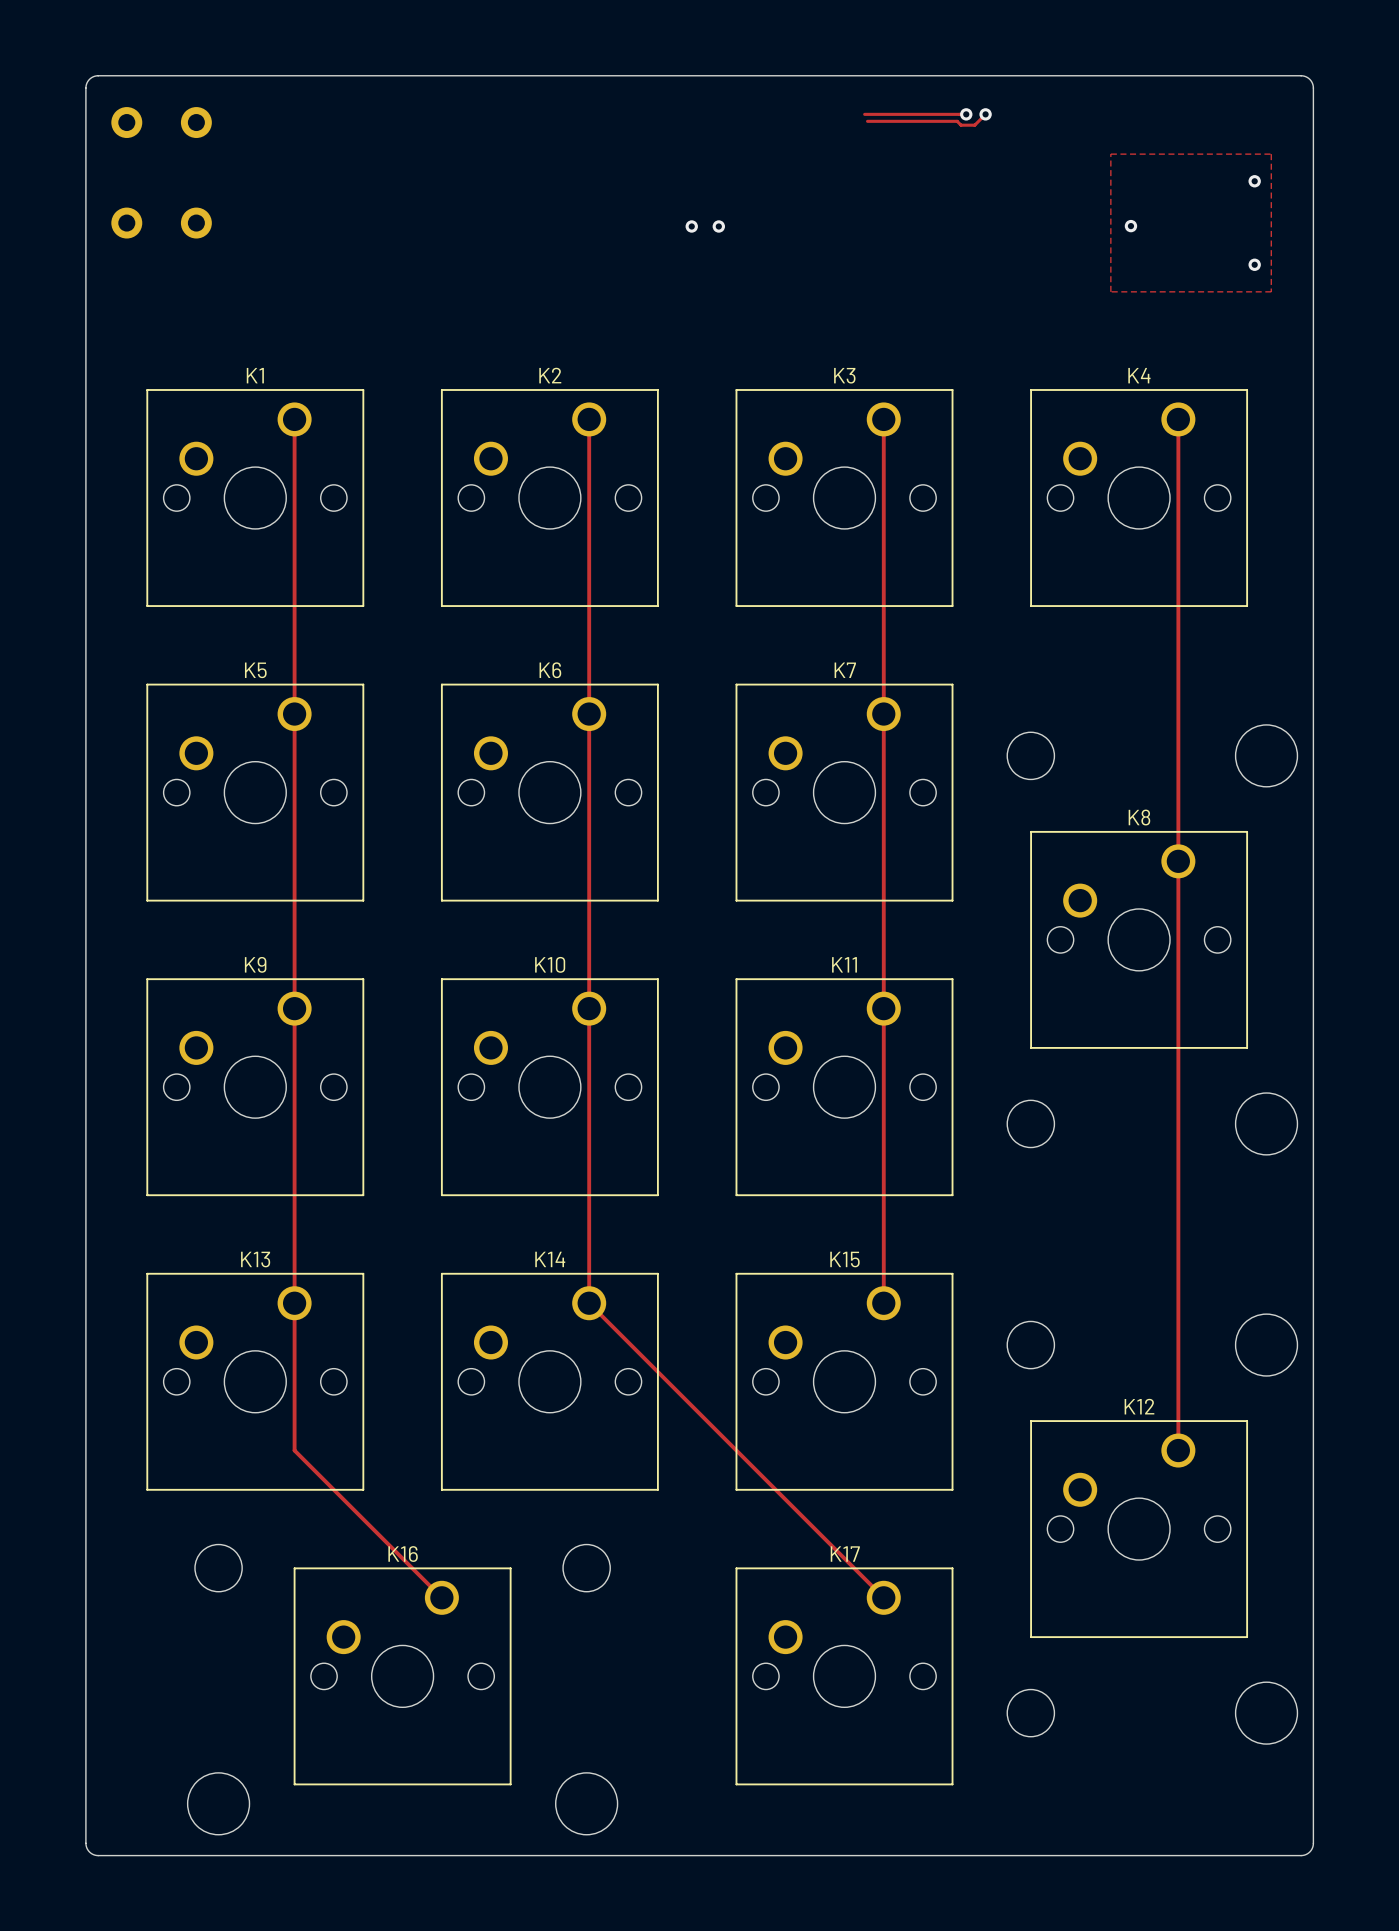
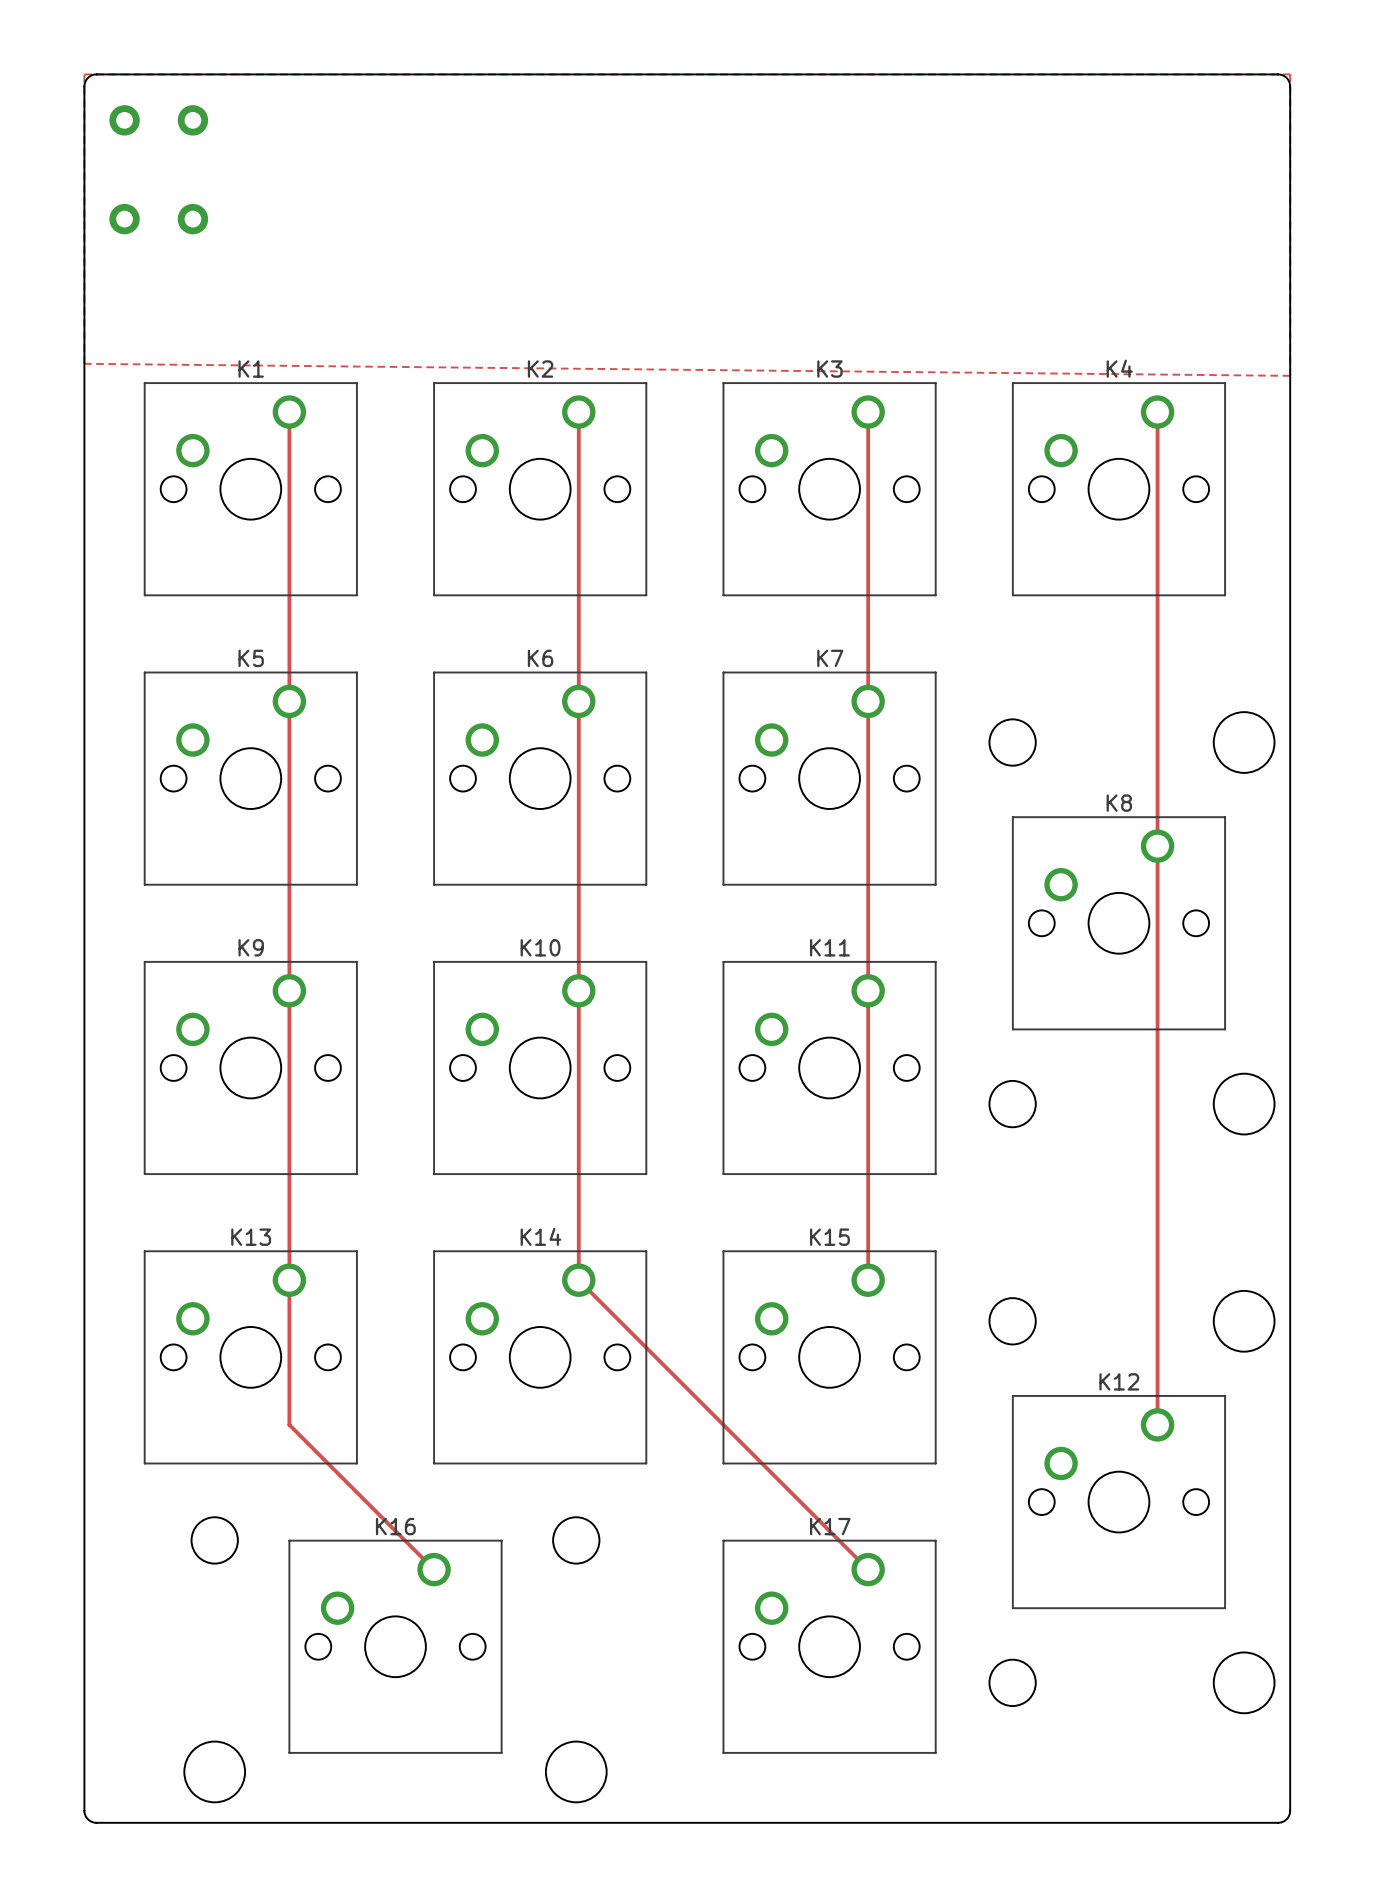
zone outline: none -> (84, 74) (84, 363) (1290, 375) (1290, 74) (84, 74)
track: (864, 114) (966, 114) -> none
via: (966, 114) -> none
track: (985, 114) (974, 125) (961, 125) (957, 121) (867, 121) -> none
via: (985, 114) -> none
zone outline: (1110, 154) (1110, 291) (1271, 291) (1271, 154) (1110, 154) -> none
via: (1254, 181) -> none
via: (691, 226) -> none
via: (718, 226) -> none
via: (1130, 226) -> none
via: (1254, 264) -> none

